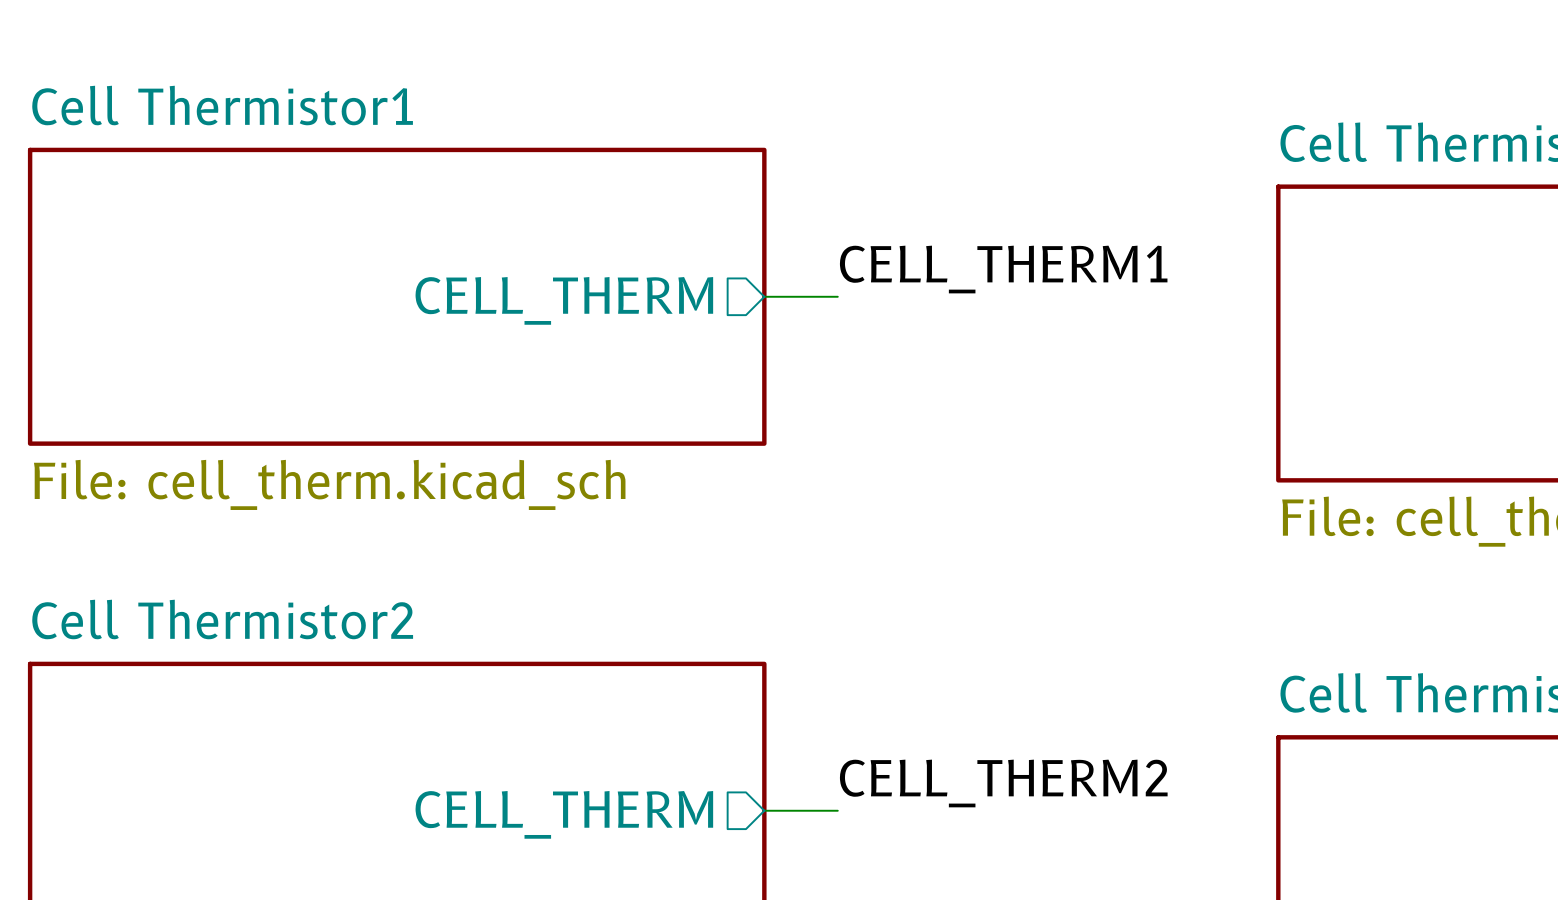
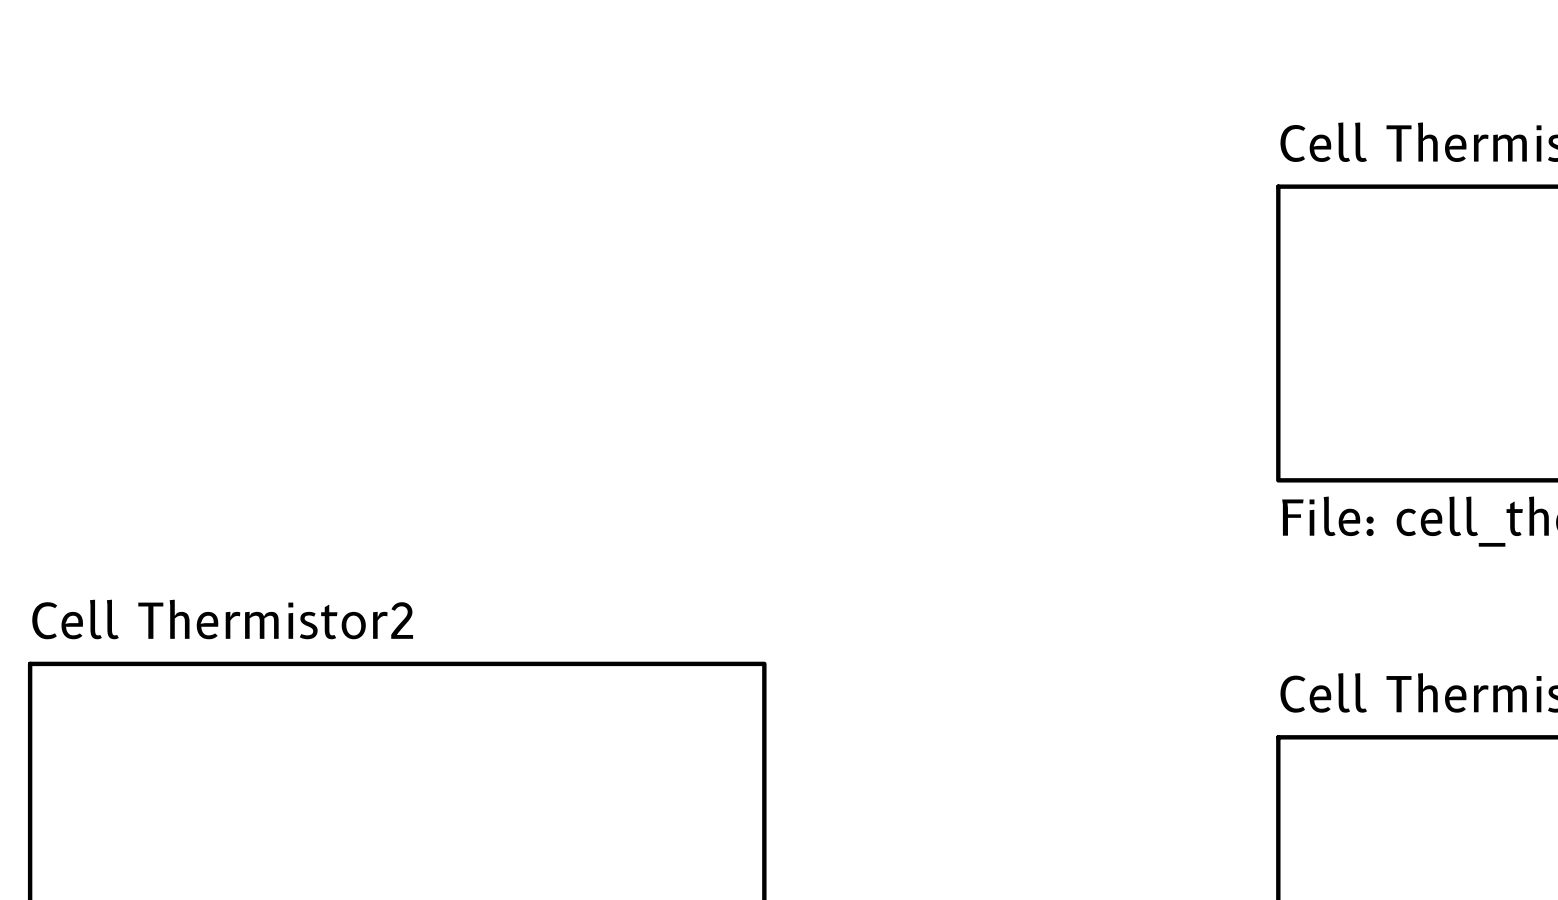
label: CELL_THERM1 (1003, 269) -> none
sheet Cell Thermistor1: File: cell_therm.kicad_sch (397, 296) -> none
wire: (764, 296) (837, 296) -> none
sheet pin: CELL_THERM (564, 300) -> none
label: CELL_THERM2 (1003, 783) -> none
wire: (764, 810) (837, 810) -> none
sheet pin: CELL_THERM (564, 814) -> none

